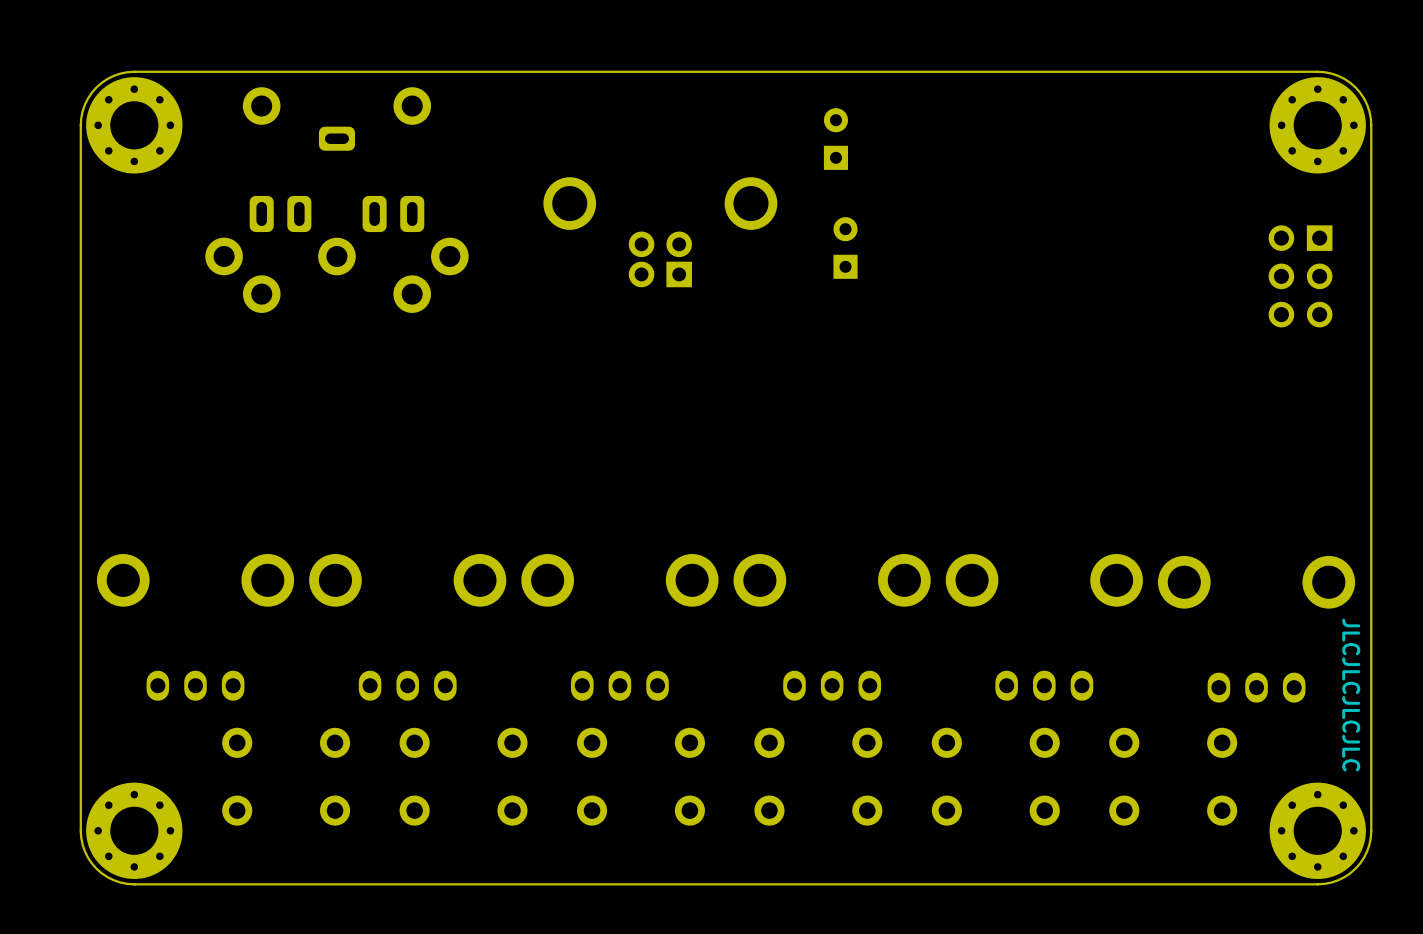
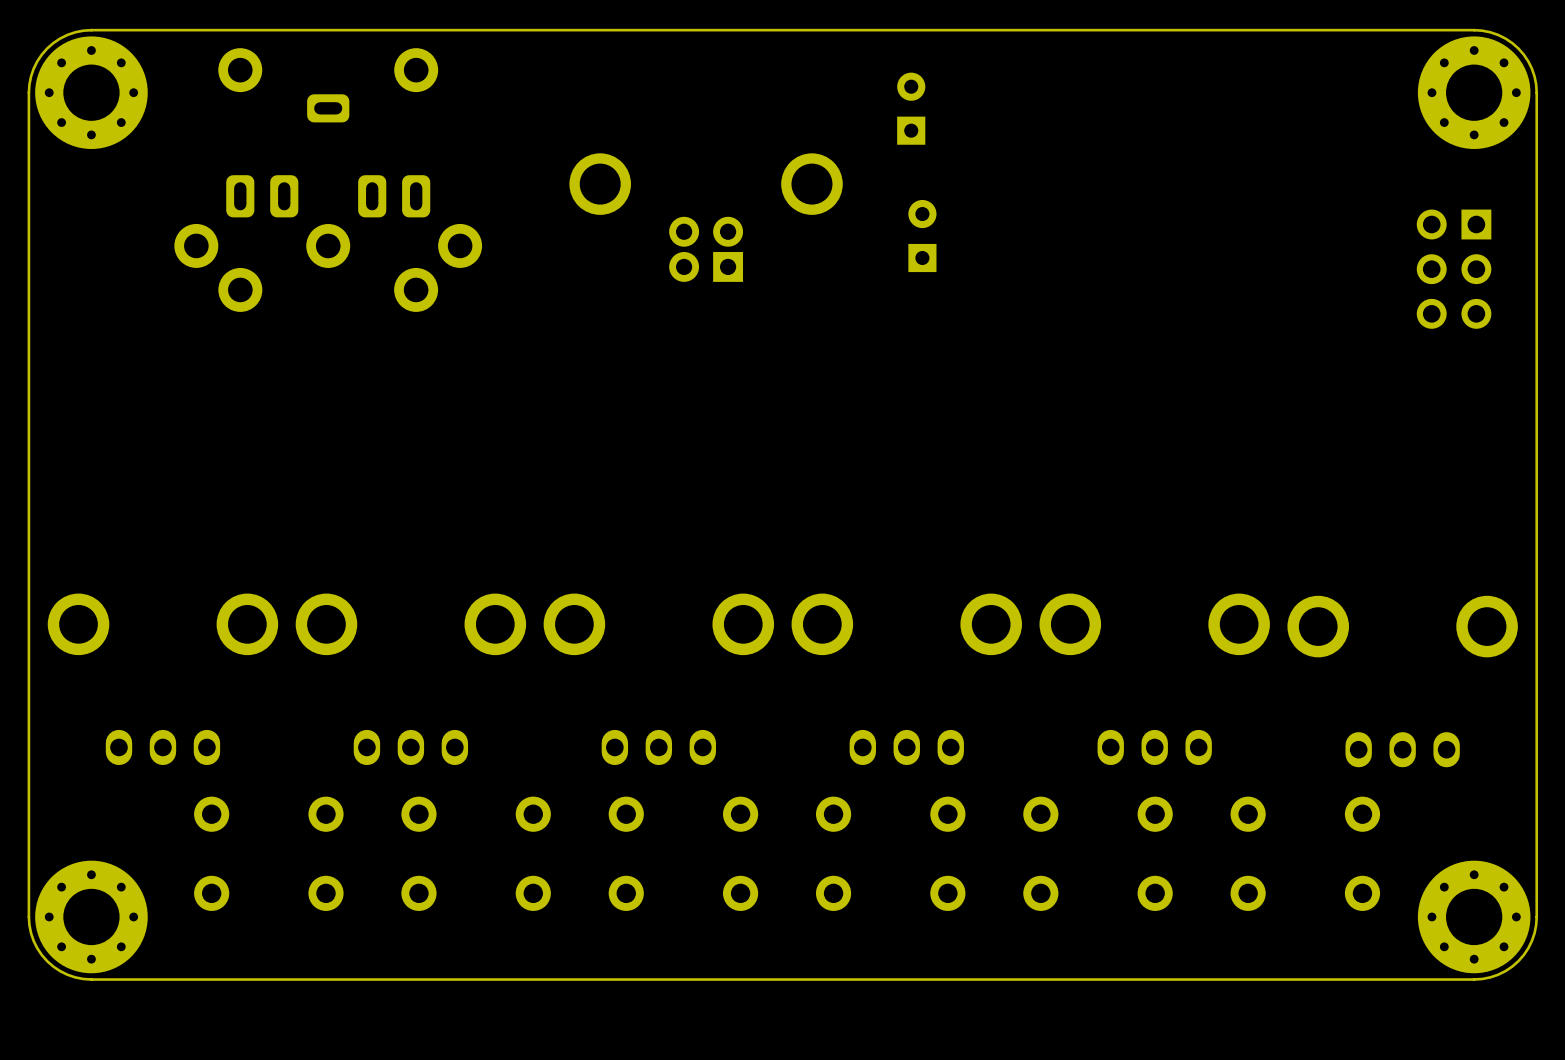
text: JLCJLCJLCJLC (1351, 695) -> none

